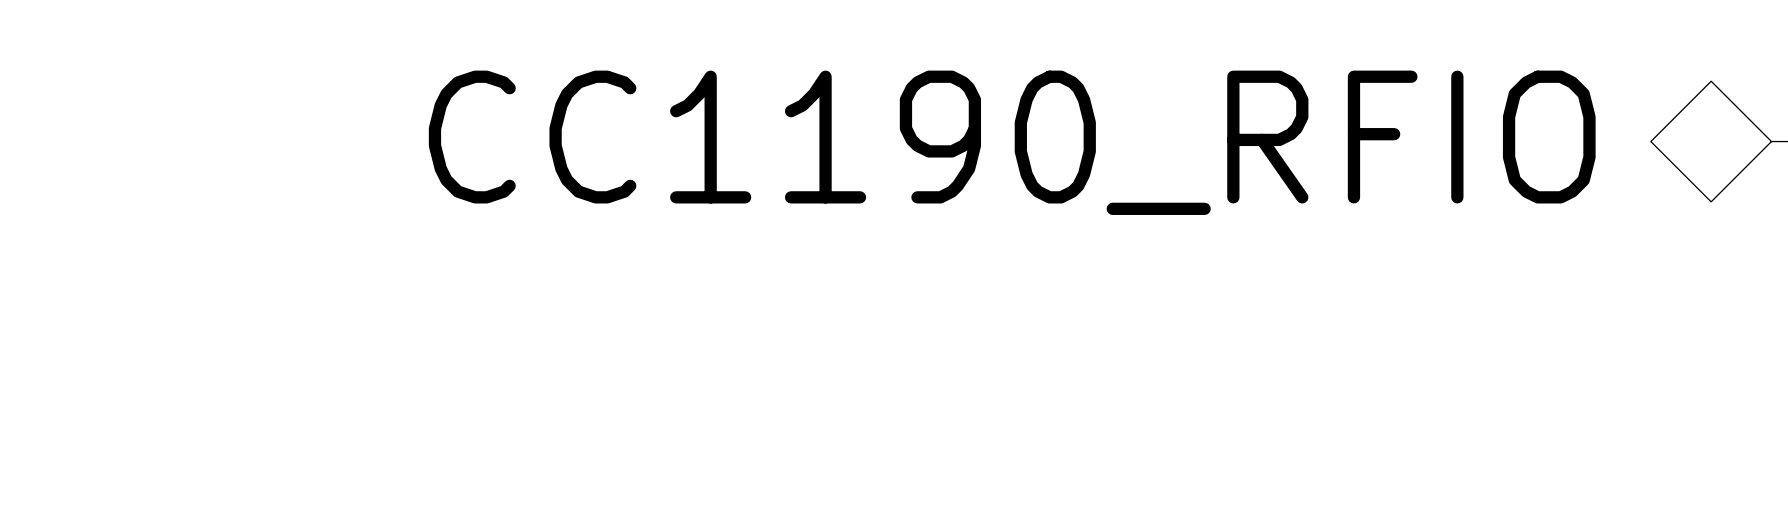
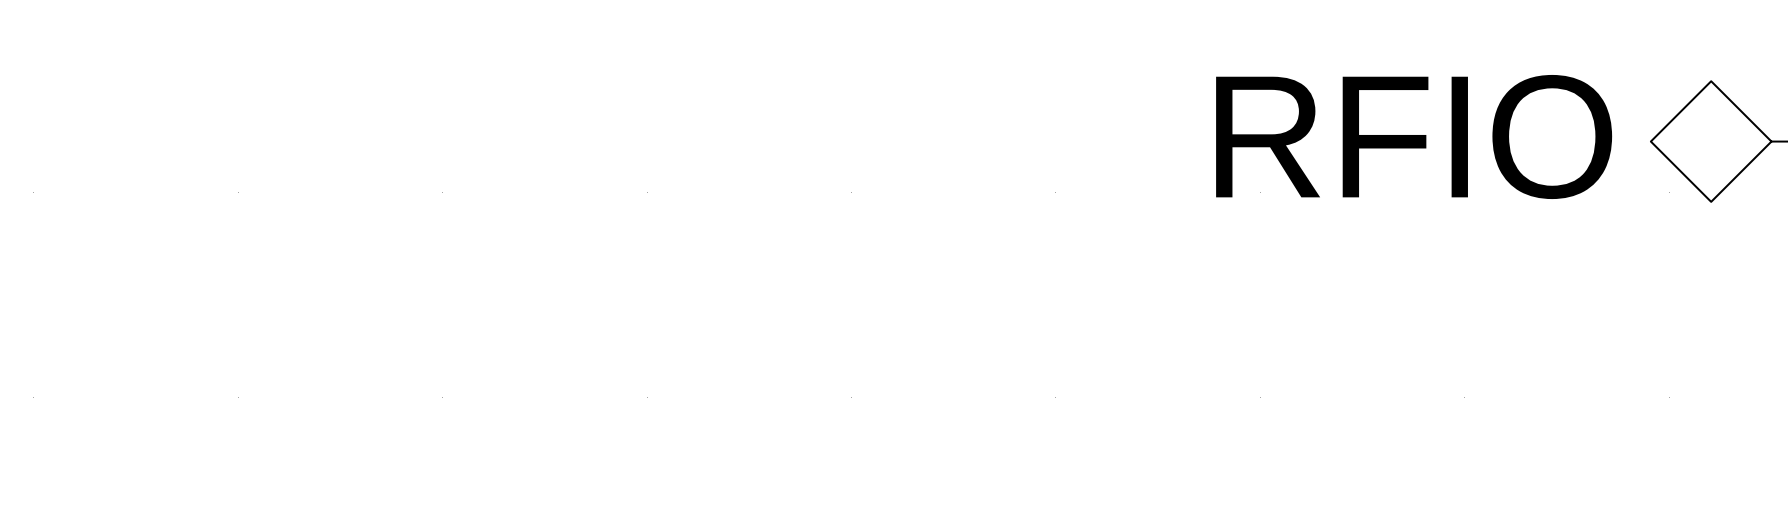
hierarchical label: CC1190_RFIO (1012, 142) -> RFIO (1414, 137)

